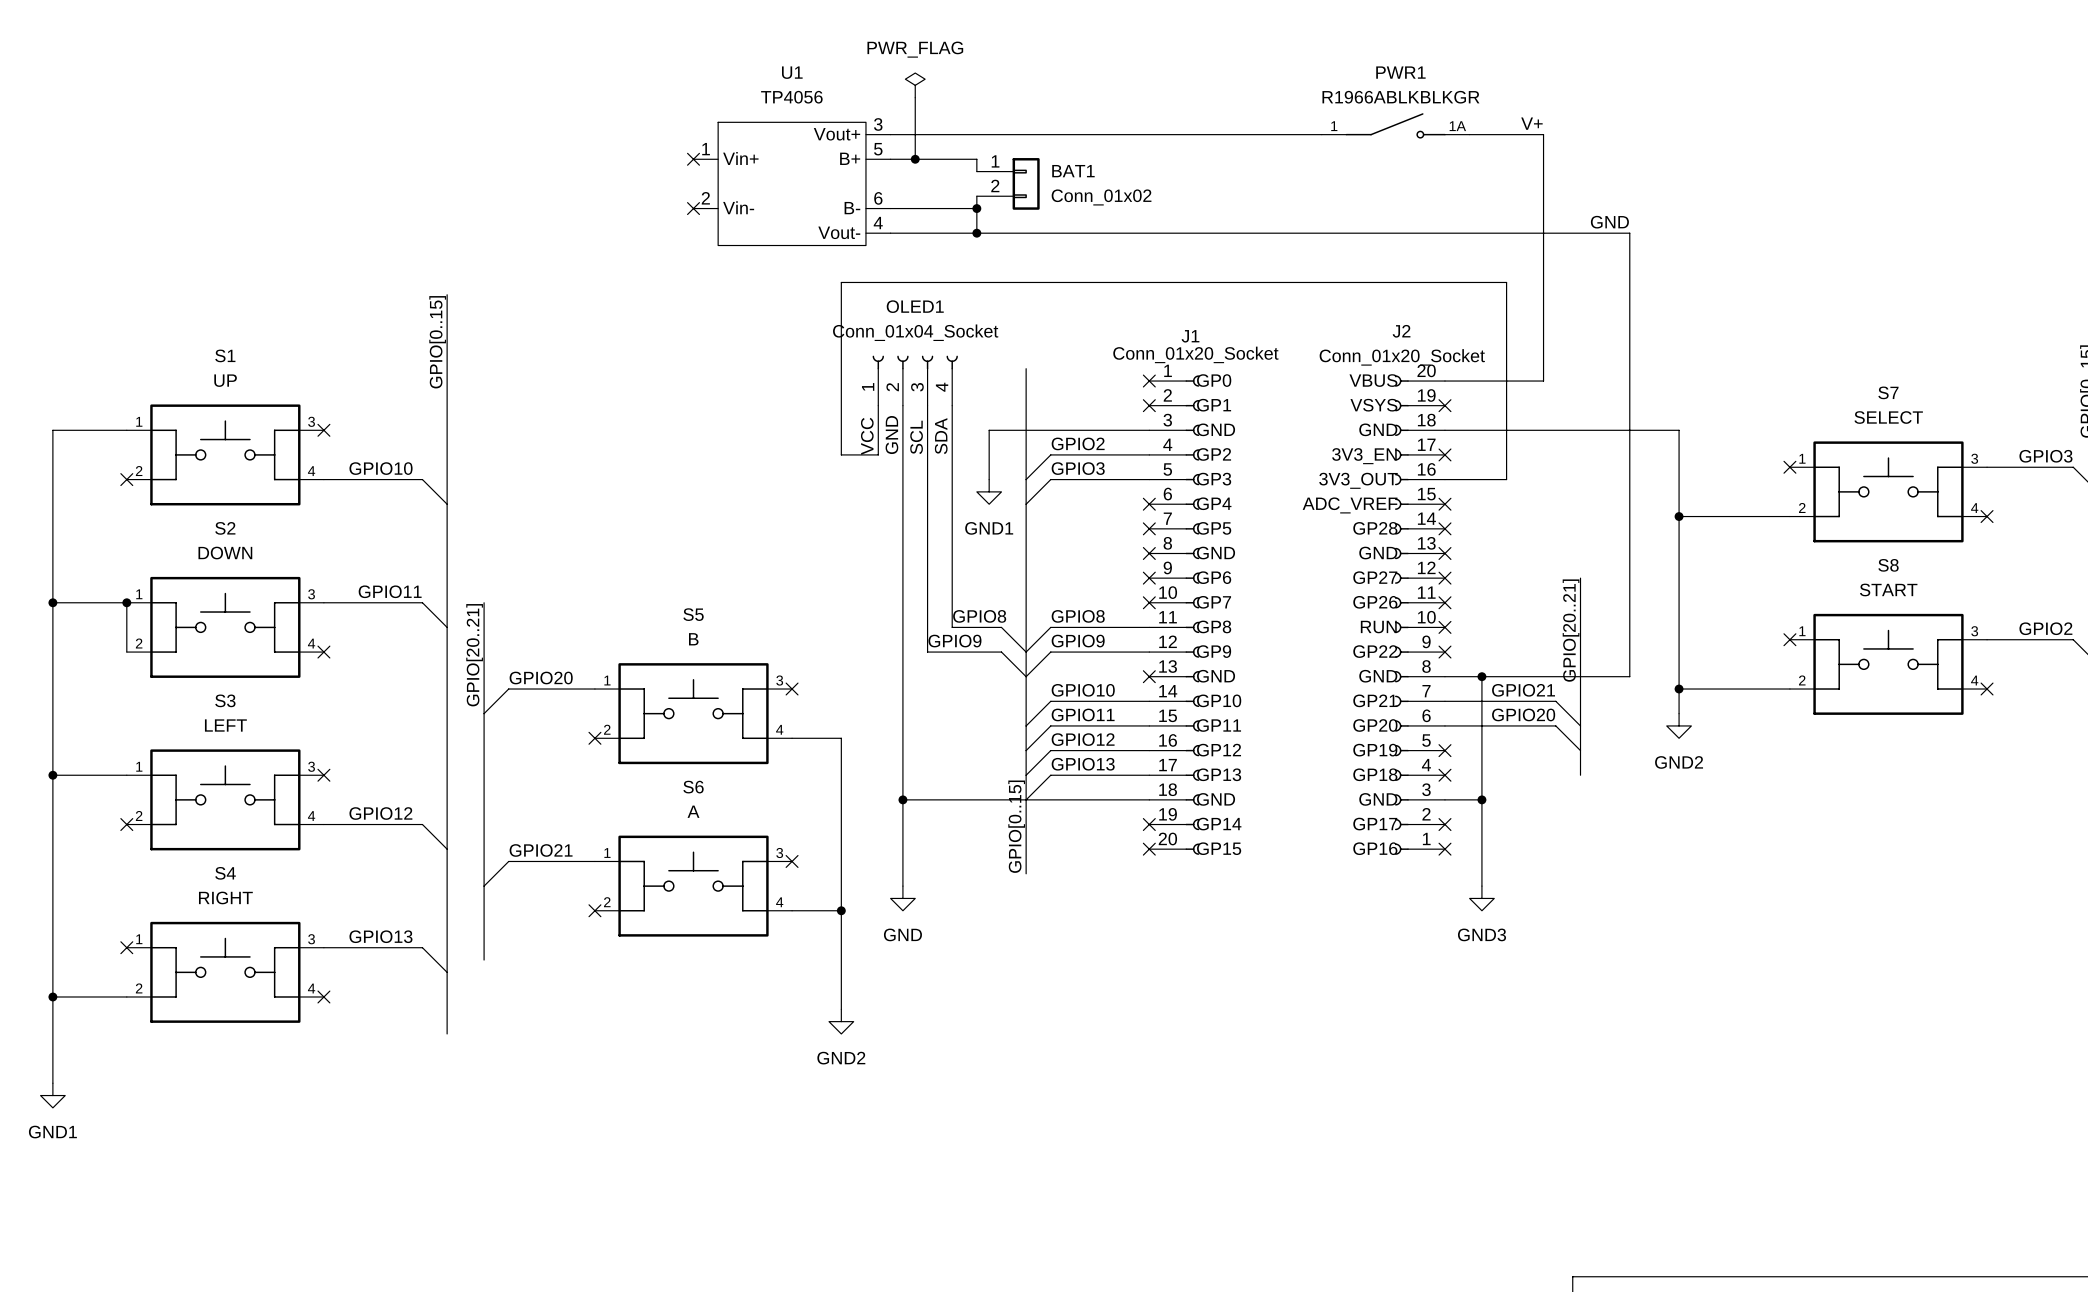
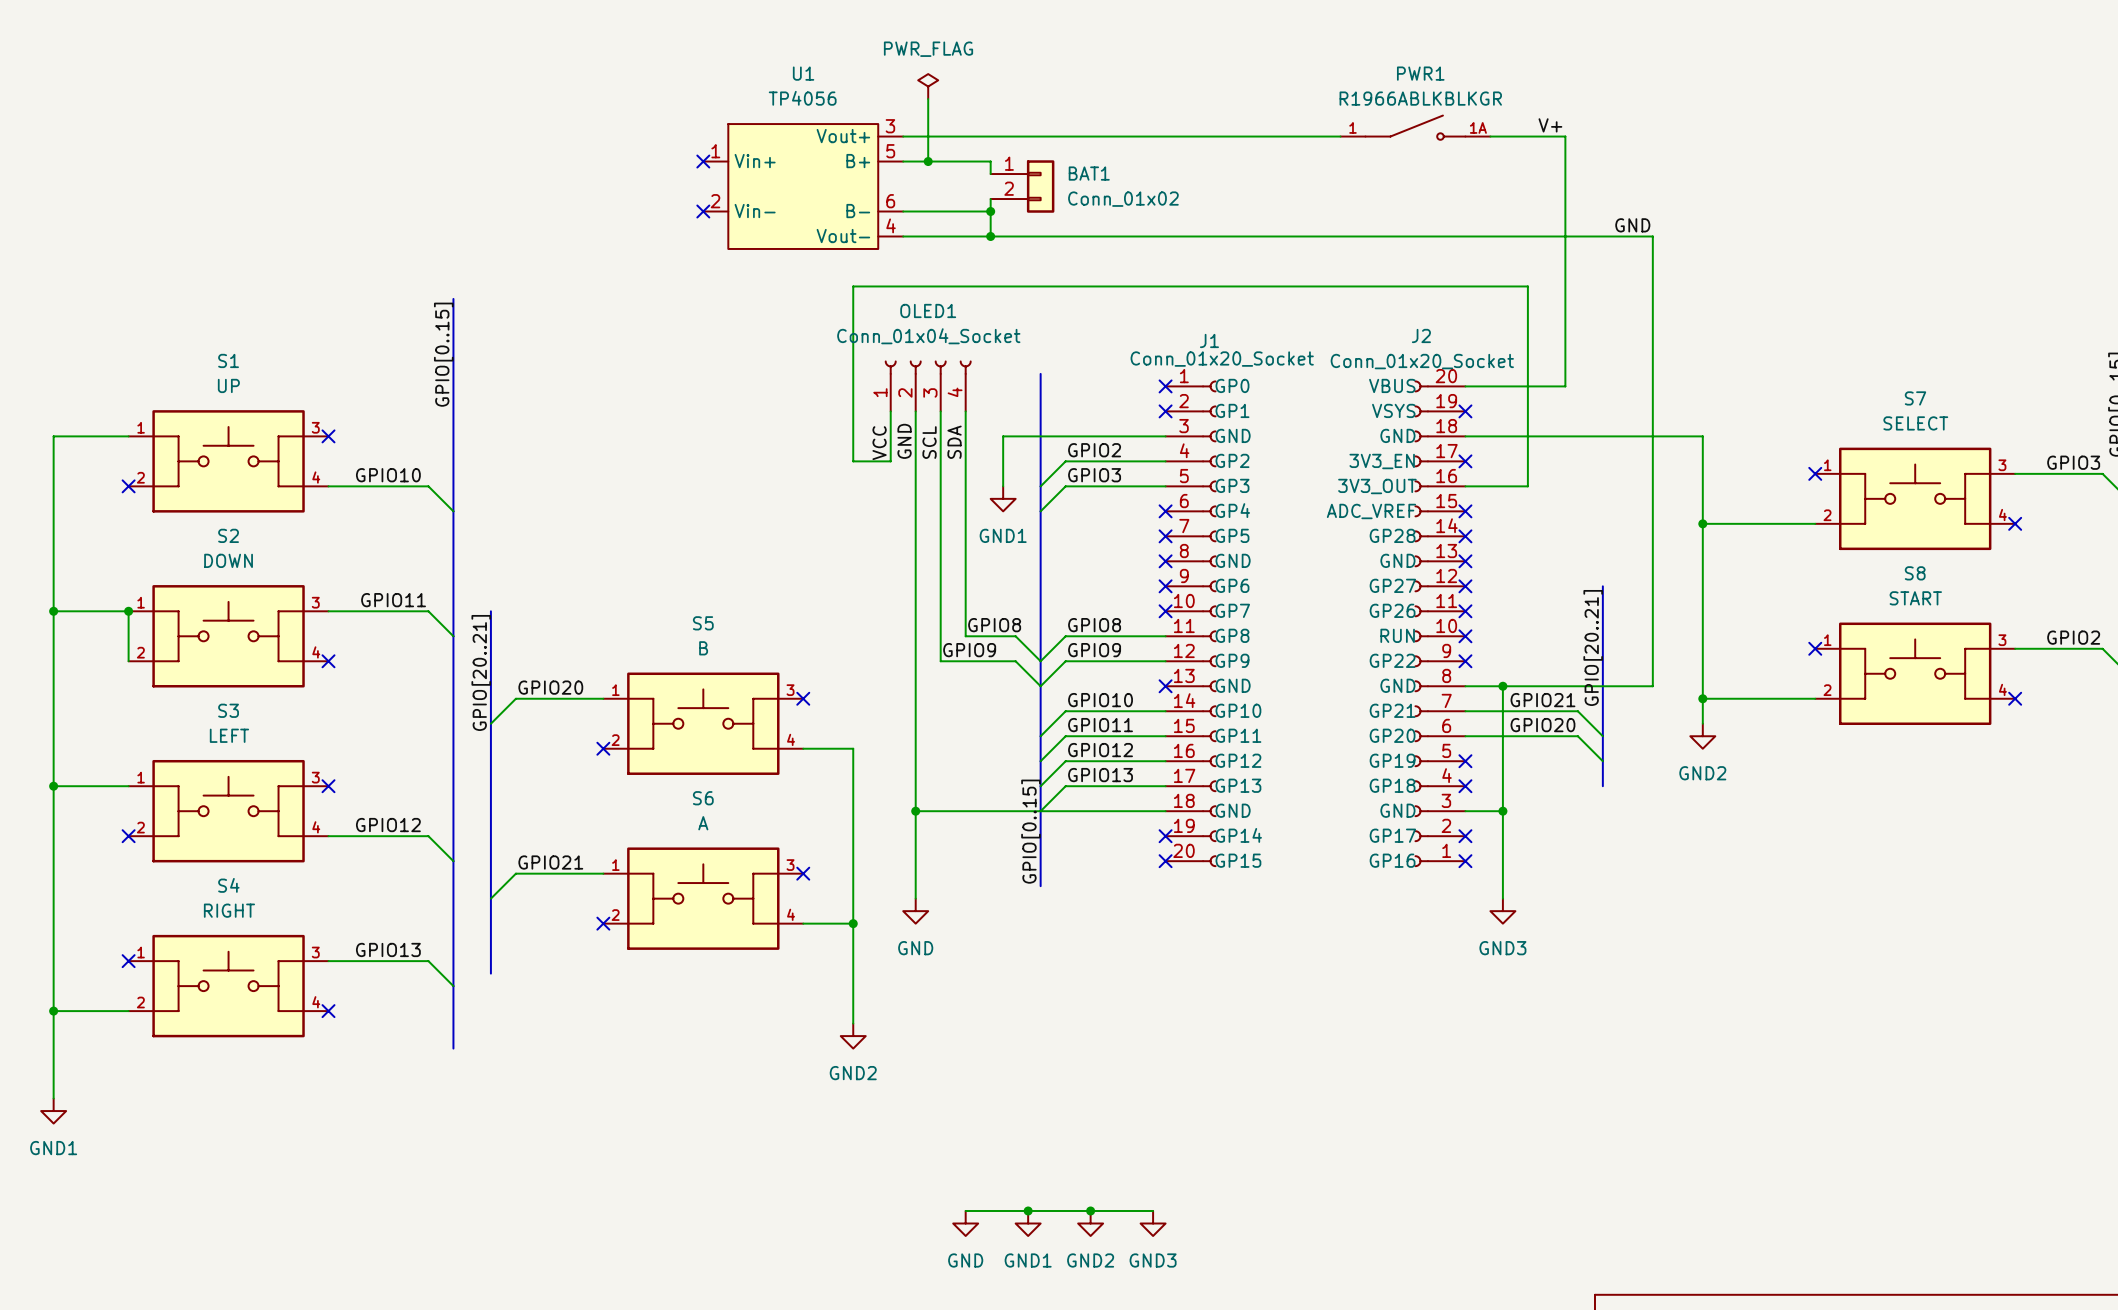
wire: none -> (965, 1211) (1153, 1211)
junction: none -> (1028, 1211)
junction: none -> (1090, 1211)
power symbol: none -> GND (965, 1223)
power symbol: none -> GND1 (1028, 1223)
power symbol: none -> GND2 (1090, 1223)
power symbol: none -> GND3 (1153, 1223)

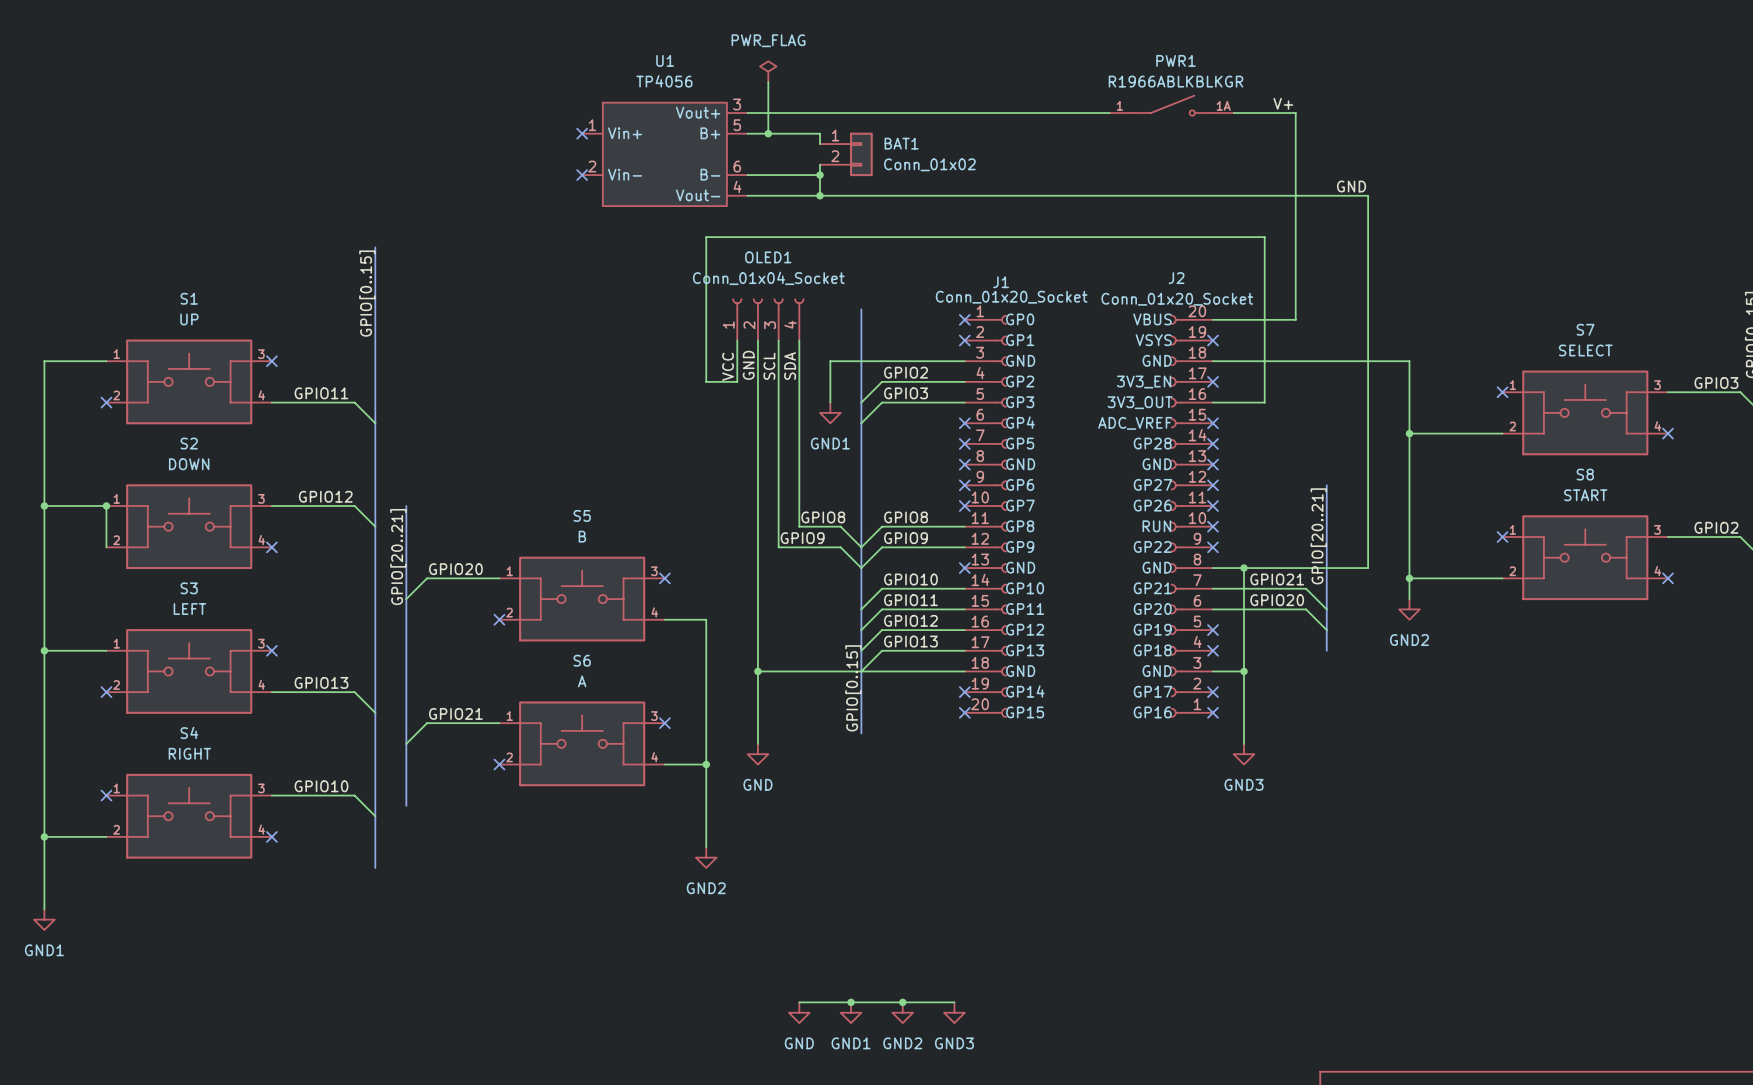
label: GPIO10 (388, 475) -> GPIO11 (321, 393)
label: GPIO11 (393, 600) -> GPIO12 (325, 496)
label: GPIO12 (388, 825) -> GPIO13 (321, 682)
label: GPIO13 (388, 949) -> GPIO10 (321, 786)

